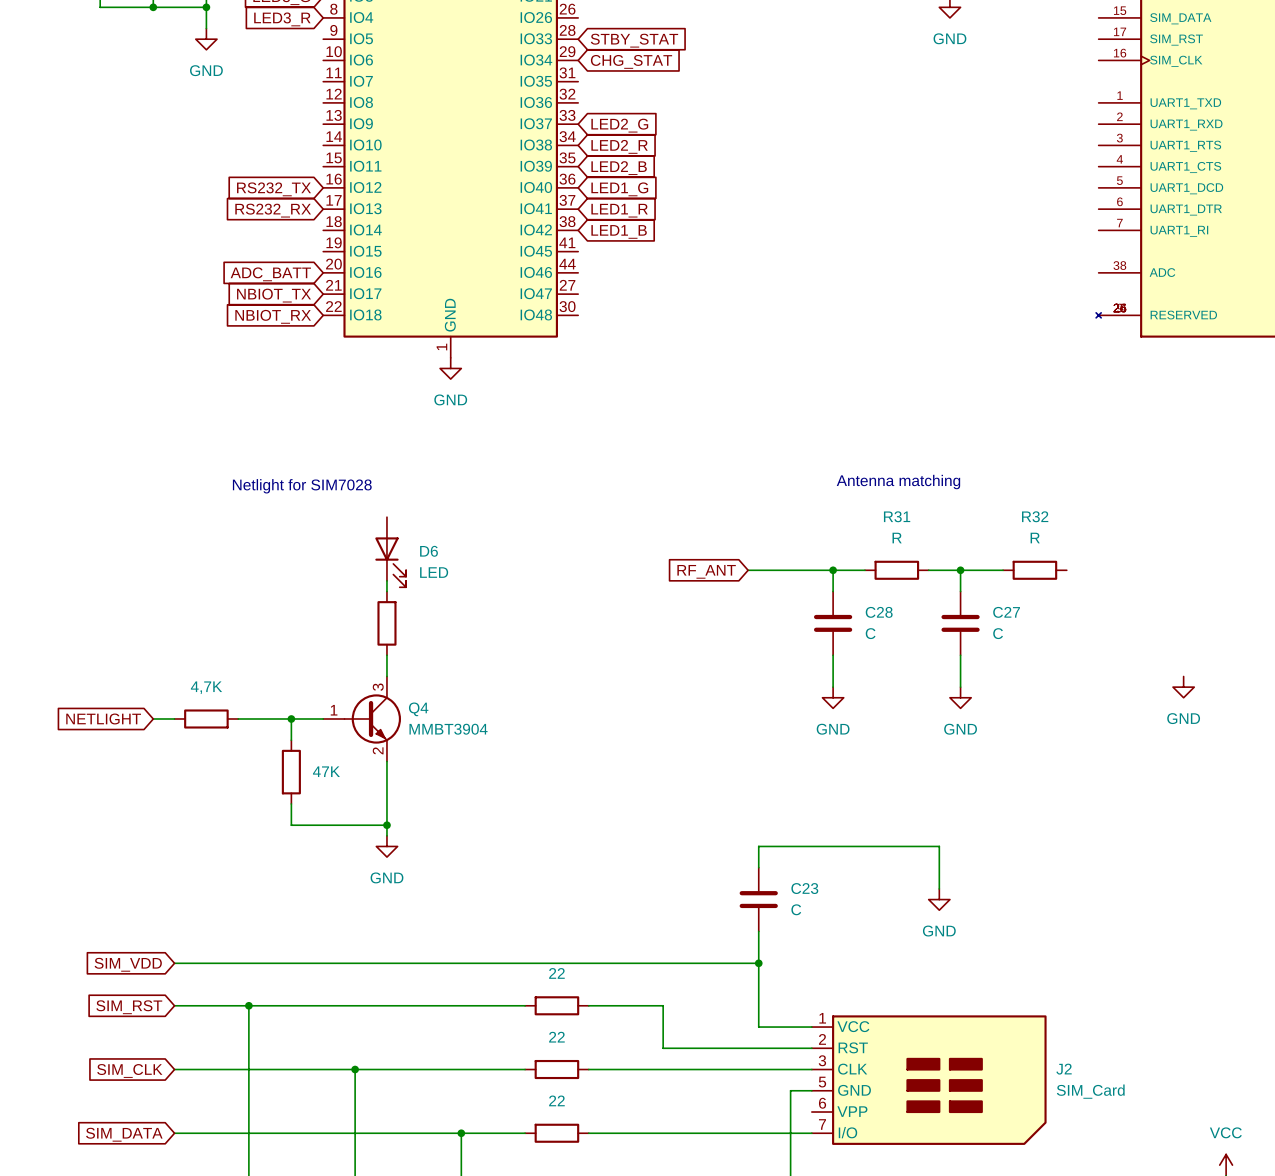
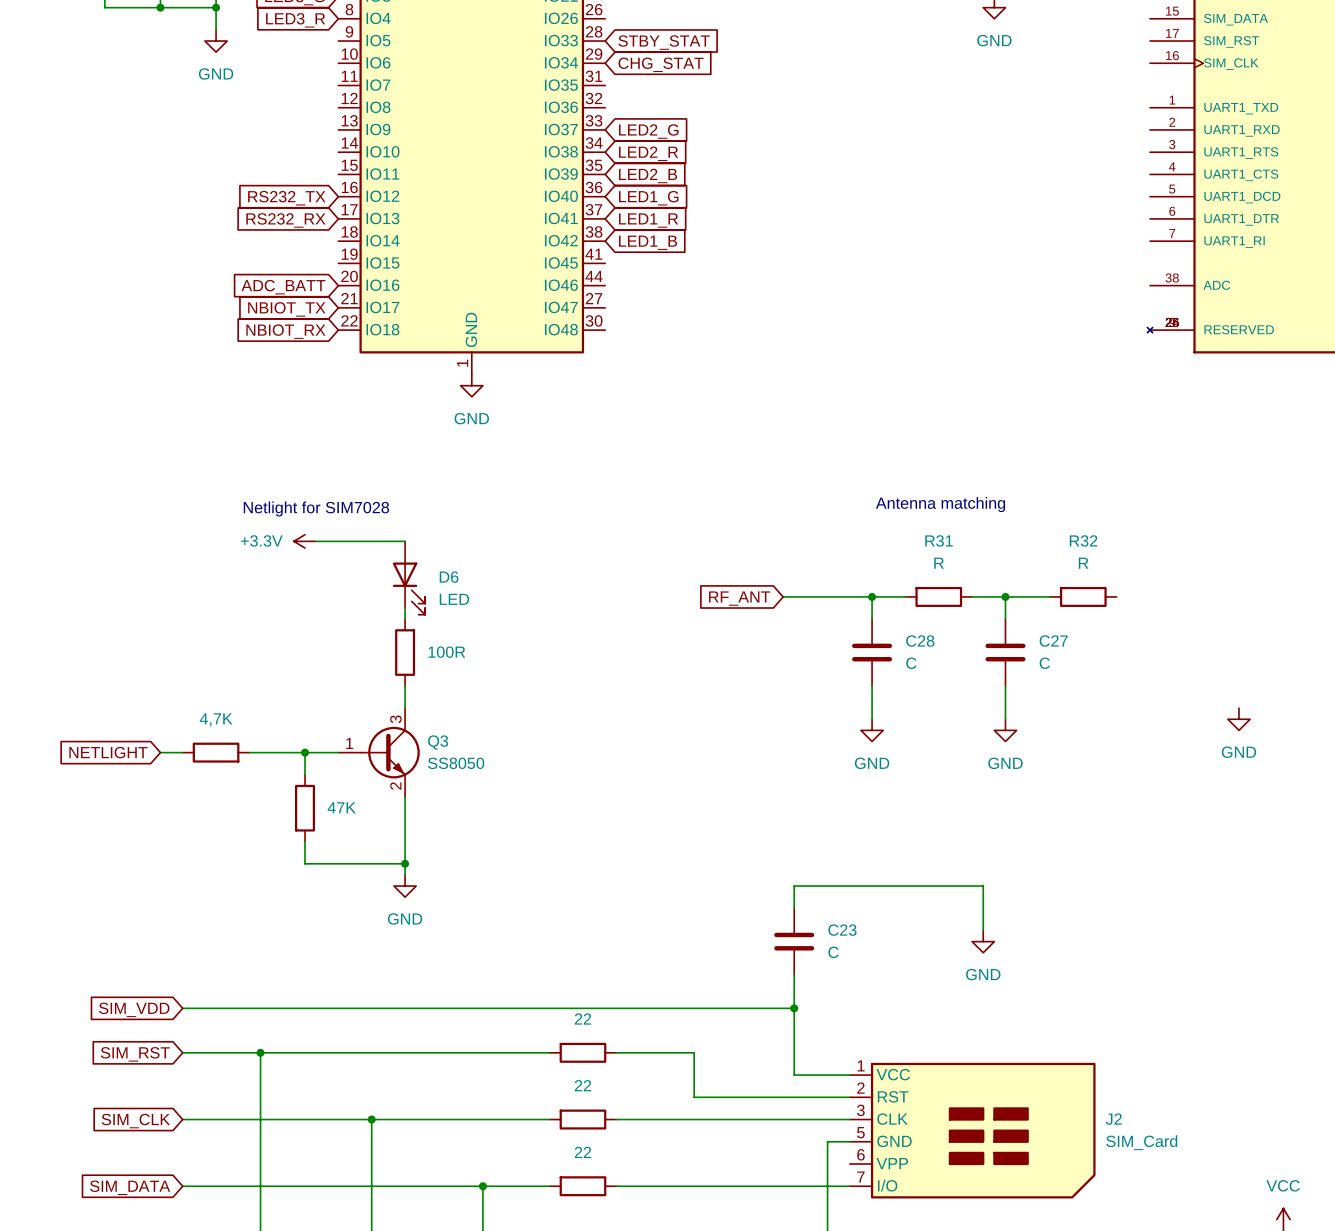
power symbol: none -> +3.3V (305, 541)
wire: none -> (316, 541) (405, 541)
part value: none -> 100R (446, 652)
Q4 name: Q4 (418, 709) -> Q3 (438, 742)
Q4 value: MMBT3904 (448, 729) -> SS8050 (456, 763)

